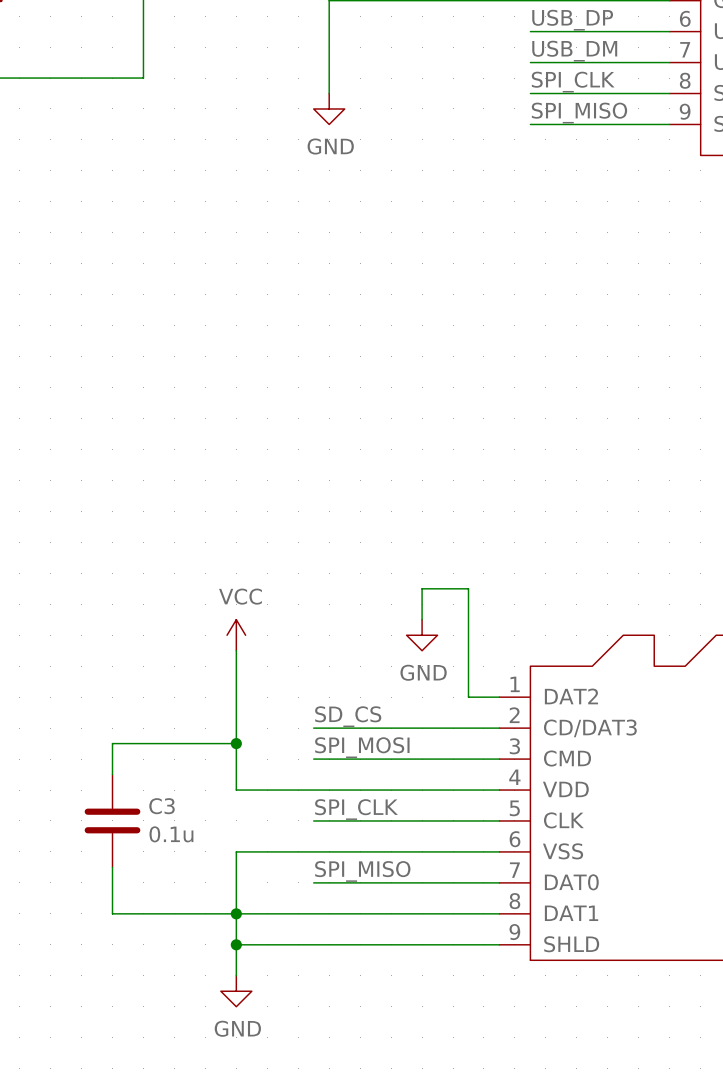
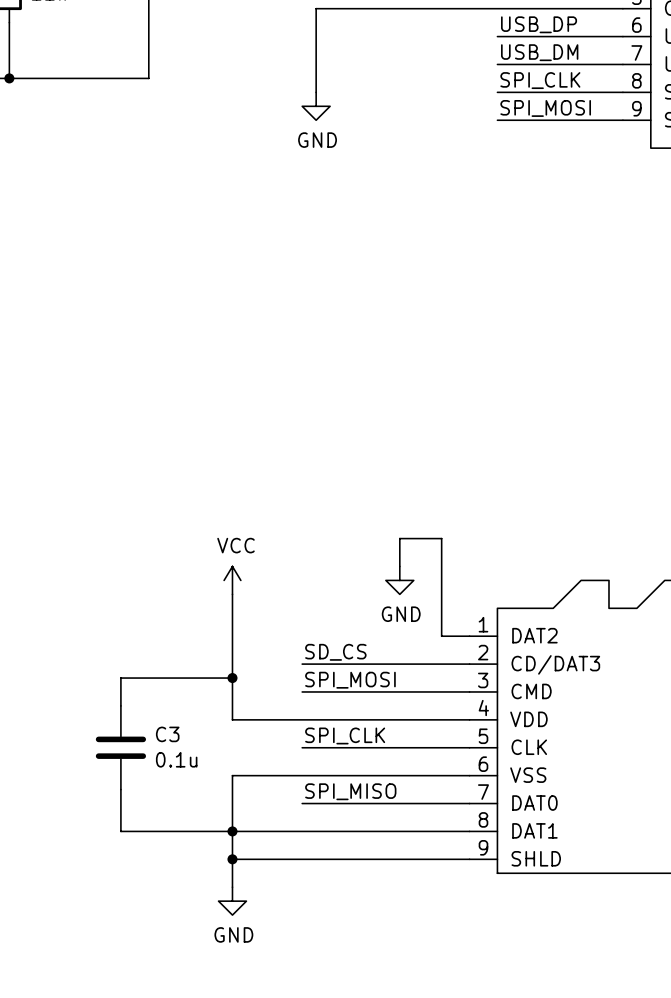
label: SPI_MISO (579, 113) -> SPI_MOSI (545, 108)

